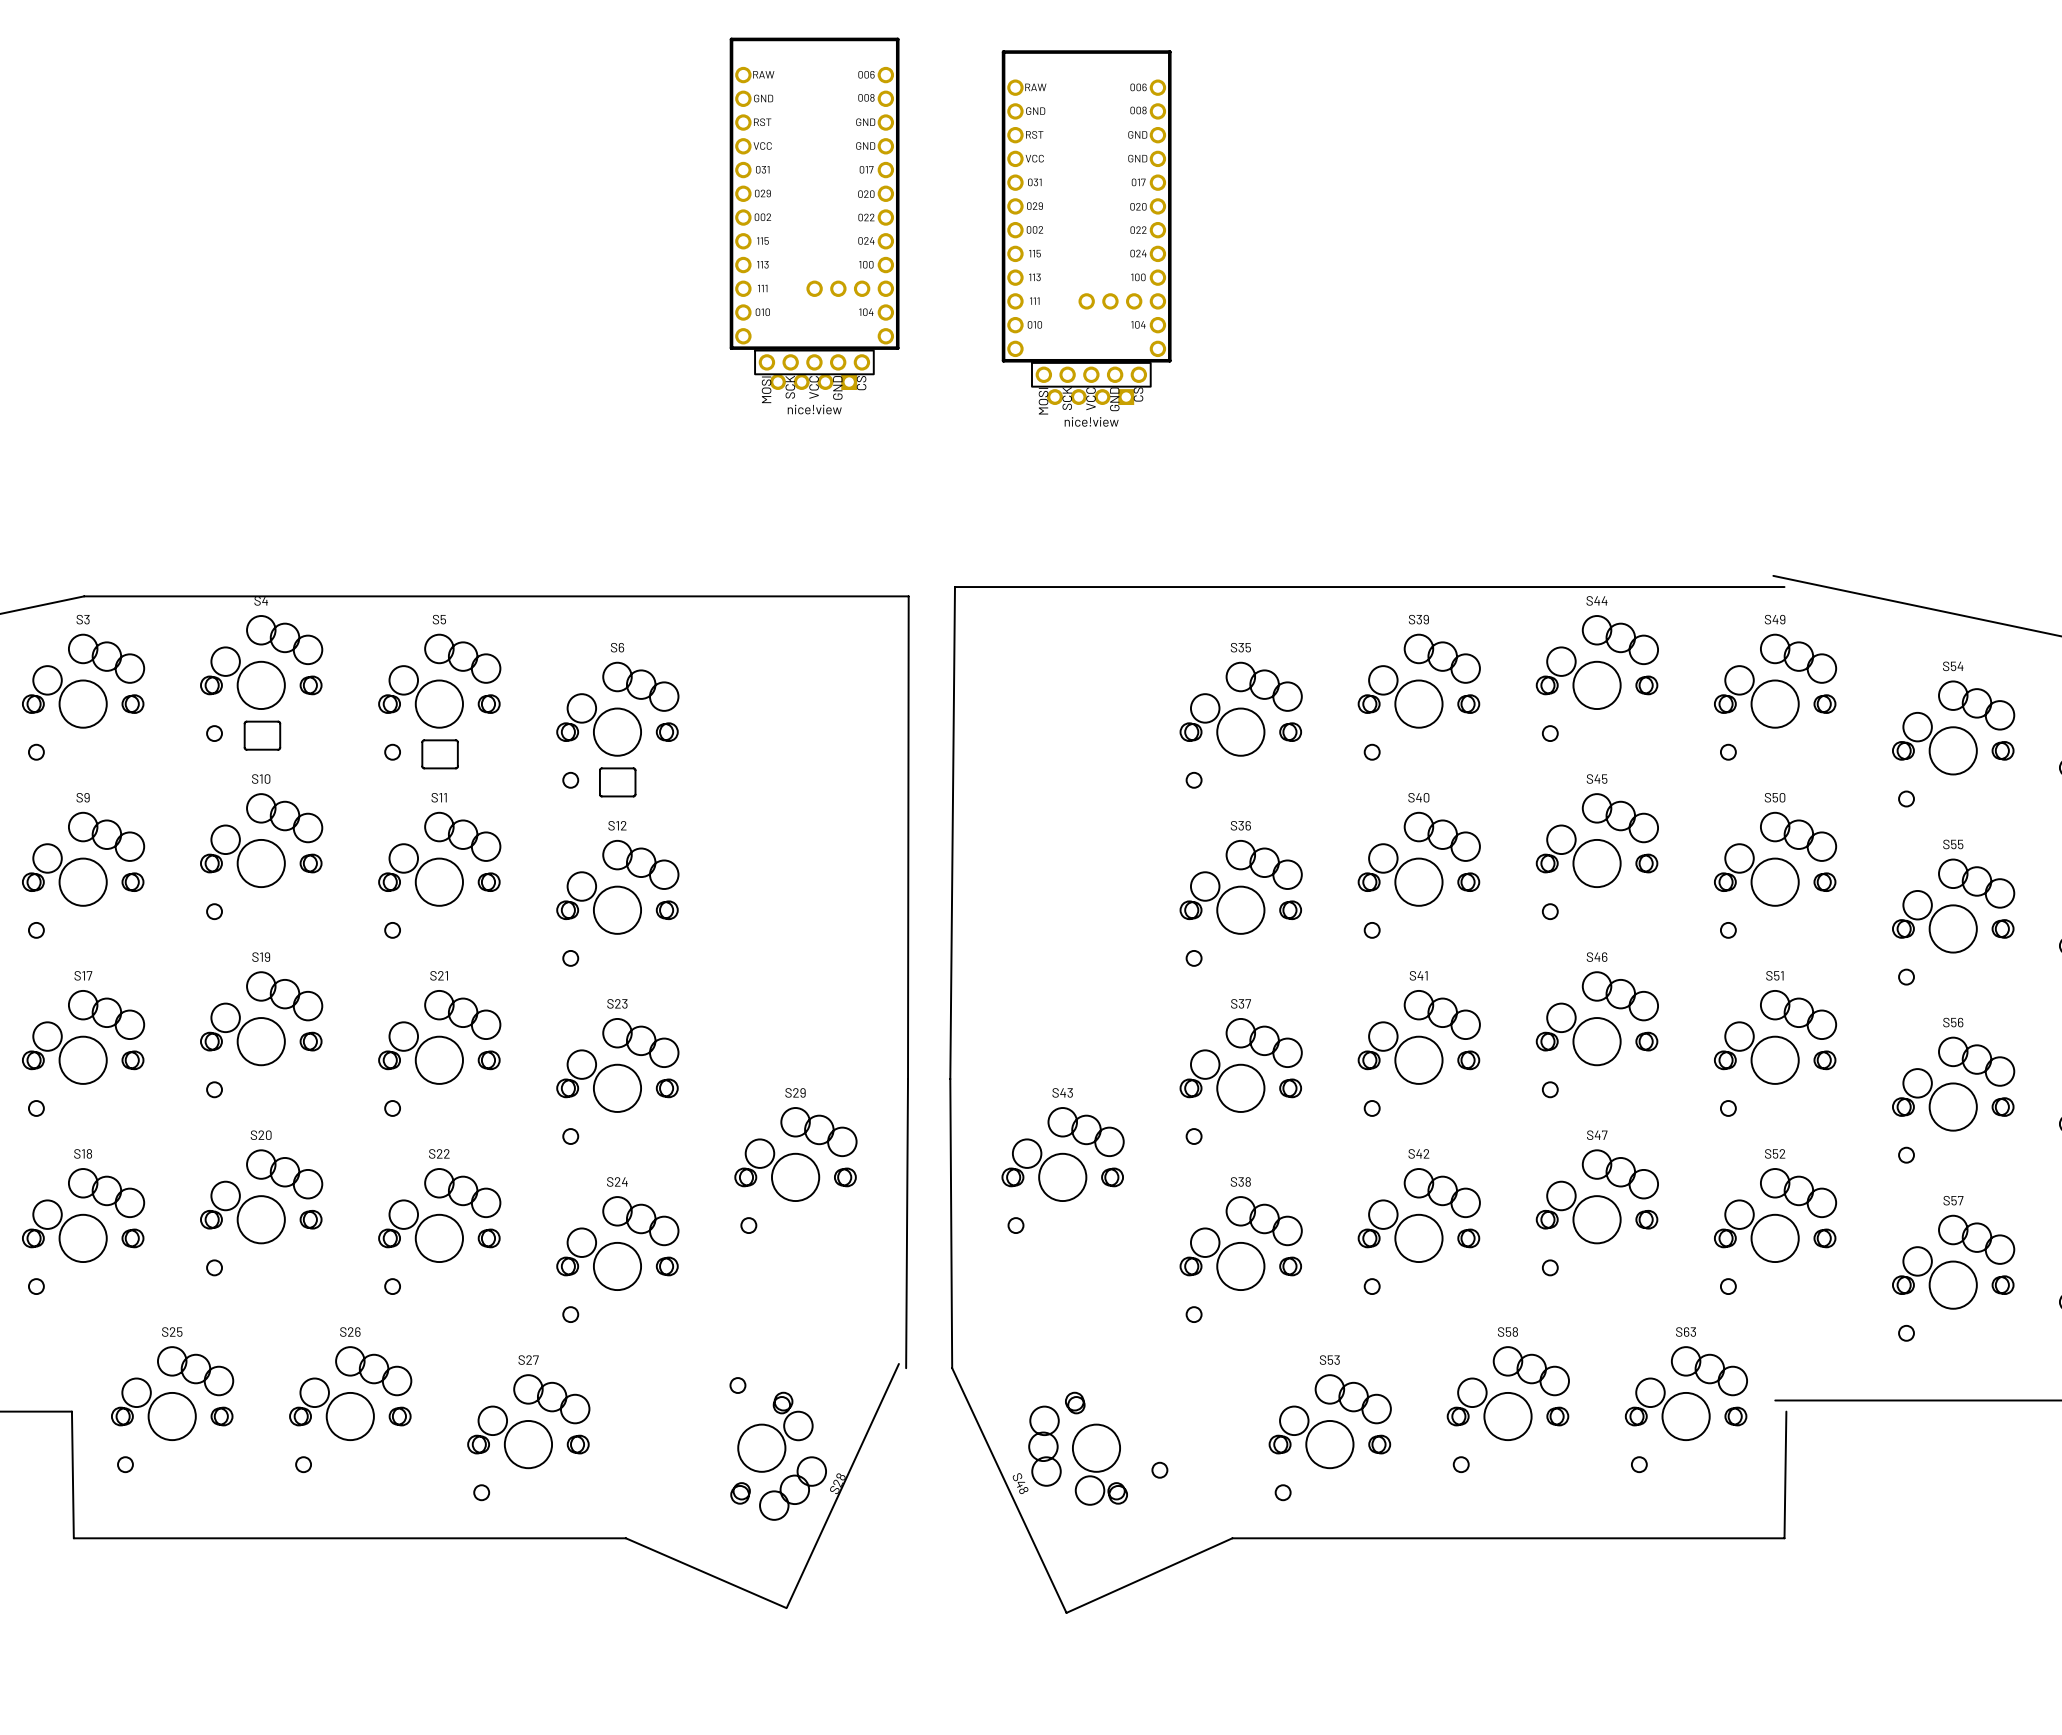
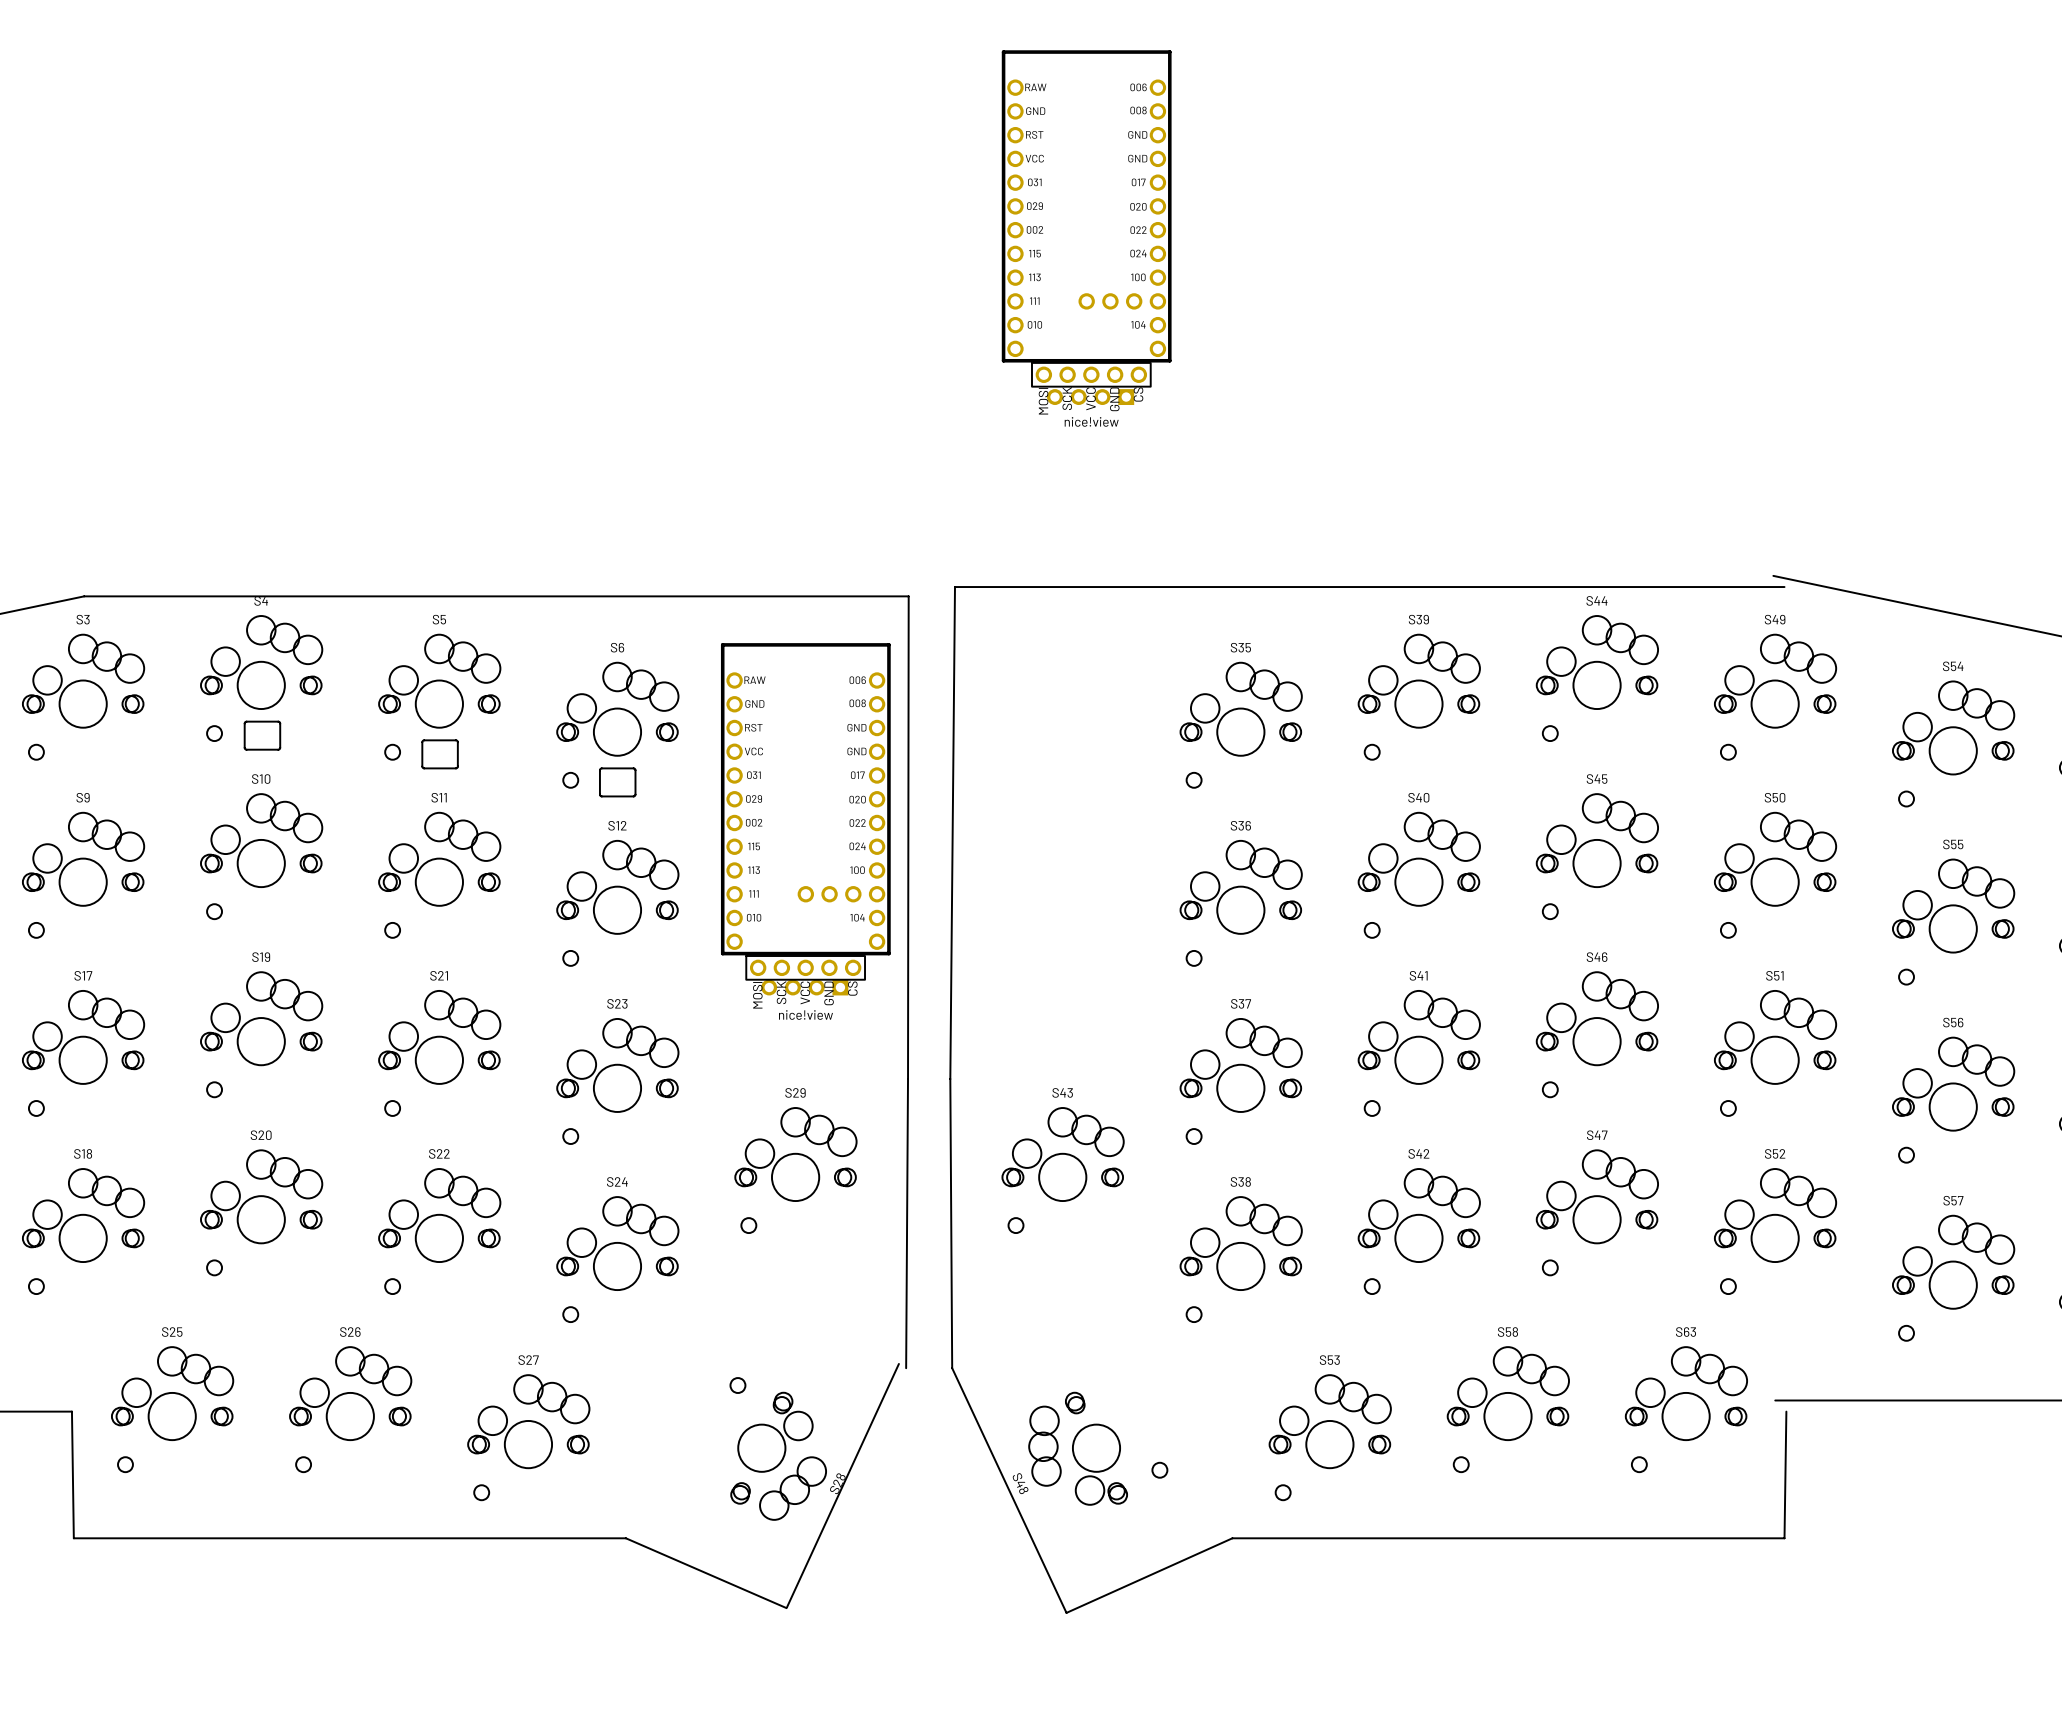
part: (814, 193) -> none
part: nice!view (814, 362) -> none
part: (813, 382) -> none
part: none -> (805, 799)
part: none -> nice!view (805, 967)
part: none -> (804, 987)

